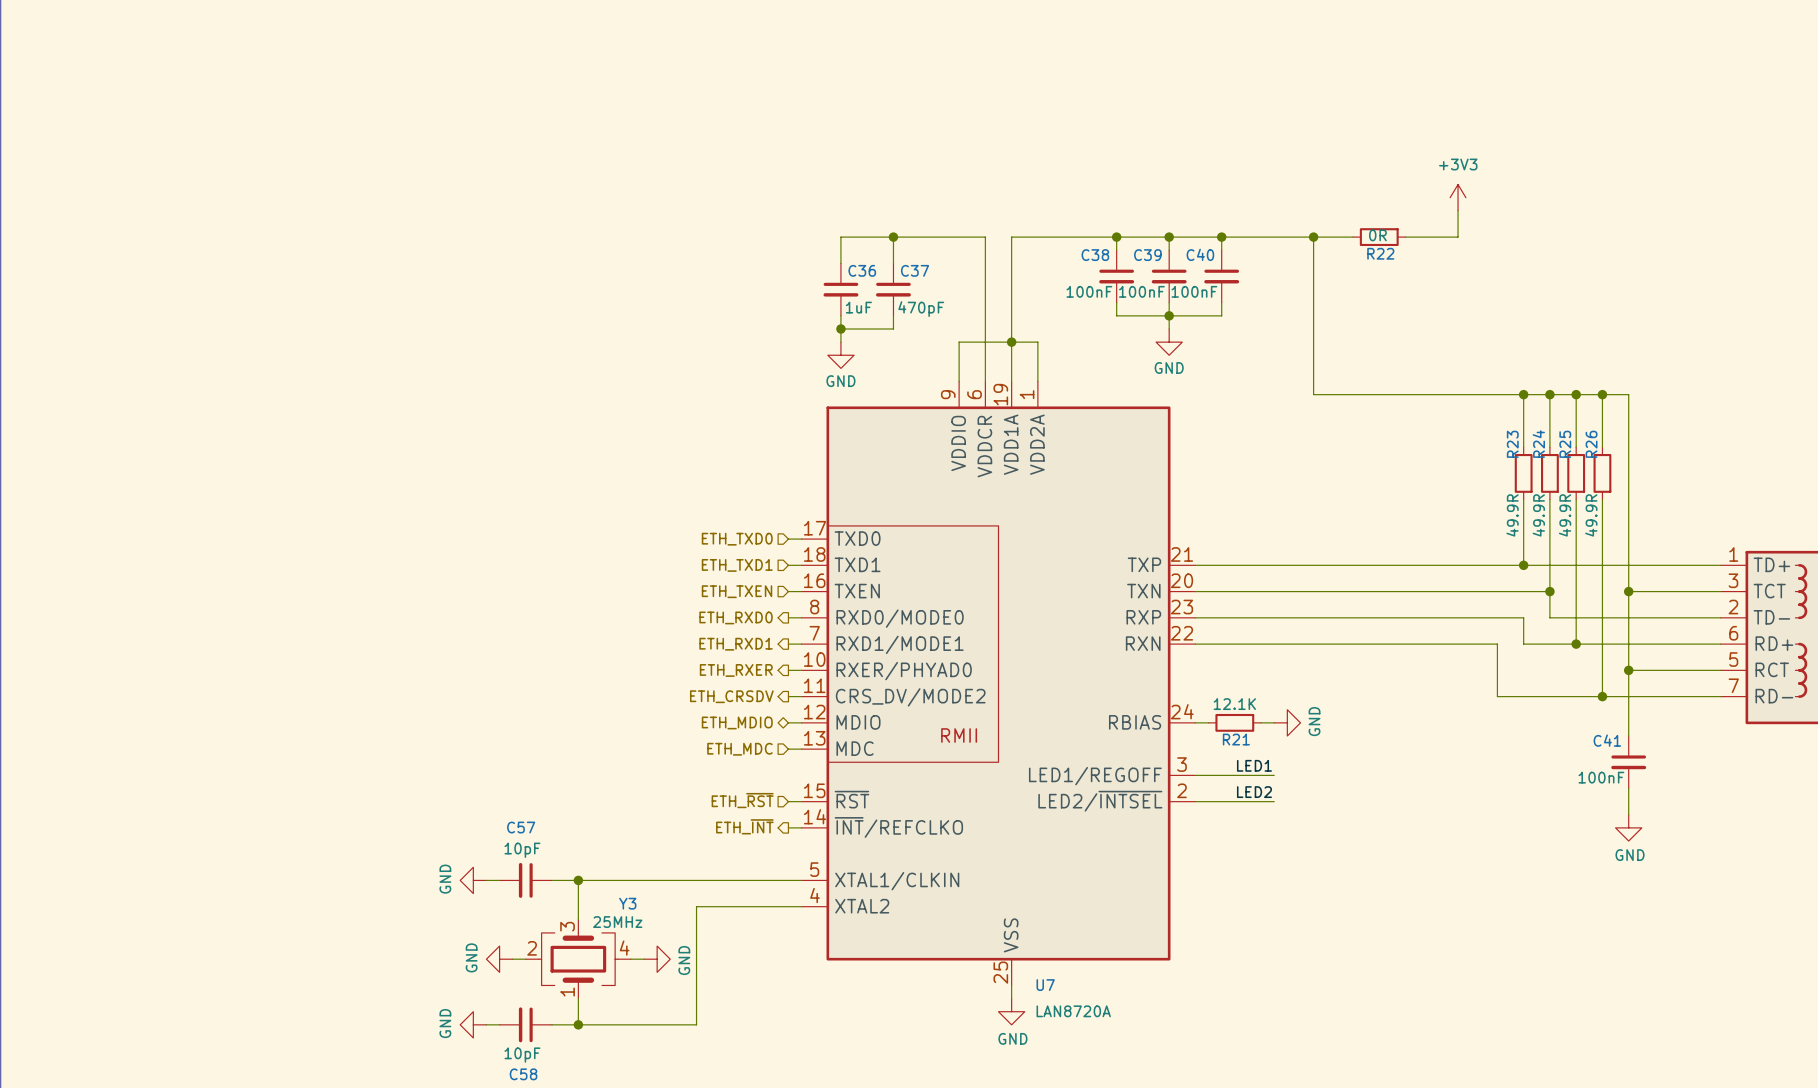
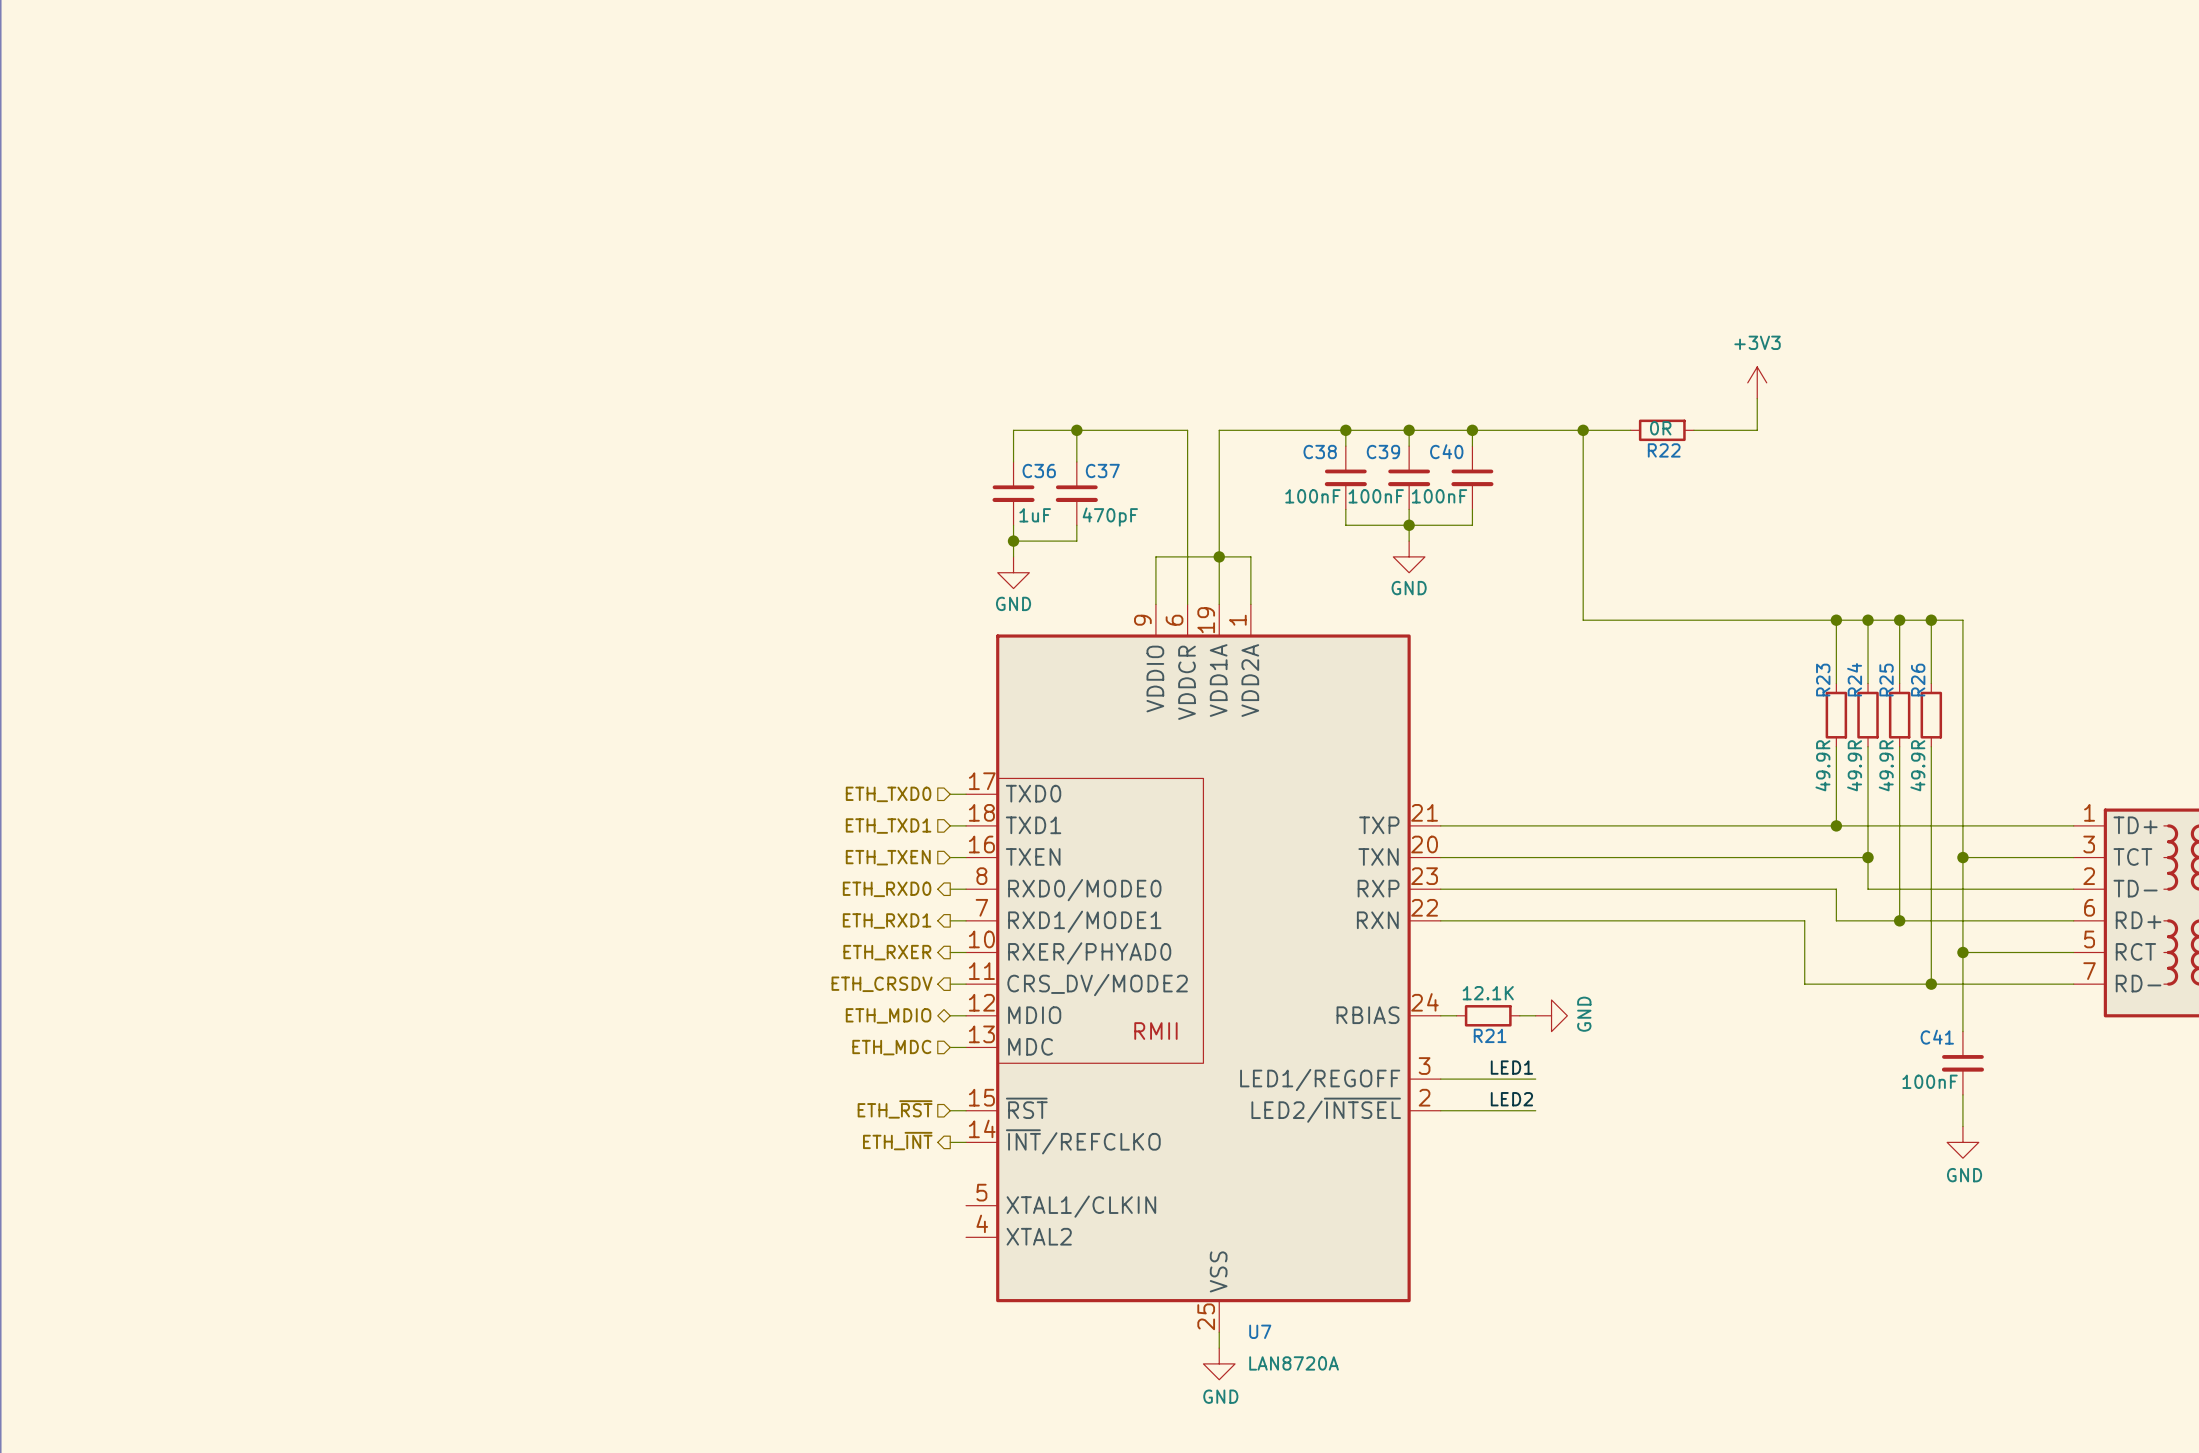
power symbol: GND (473, 880) -> none
wire: (486, 880) (499, 880) -> none
C57: 10pF (525, 880) -> none
wire: (552, 880) (801, 880) -> none
wire: (578, 880) (578, 919) -> none
junction: (578, 880) -> none
wire: (801, 906) (696, 906) (696, 1024) (552, 1024) -> none
power symbol: GND (499, 959) -> none
wire: (512, 959) (525, 959) -> none
Y3: 25MHz (578, 959) -> none
wire: (630, 959) (644, 959) -> none
power symbol: GND (657, 959) -> none
wire: (578, 998) (578, 1024) -> none
power symbol: GND (473, 1024) -> none
wire: (486, 1024) (499, 1024) -> none
C58: 10pF (525, 1024) -> none
junction: (578, 1024) -> none

